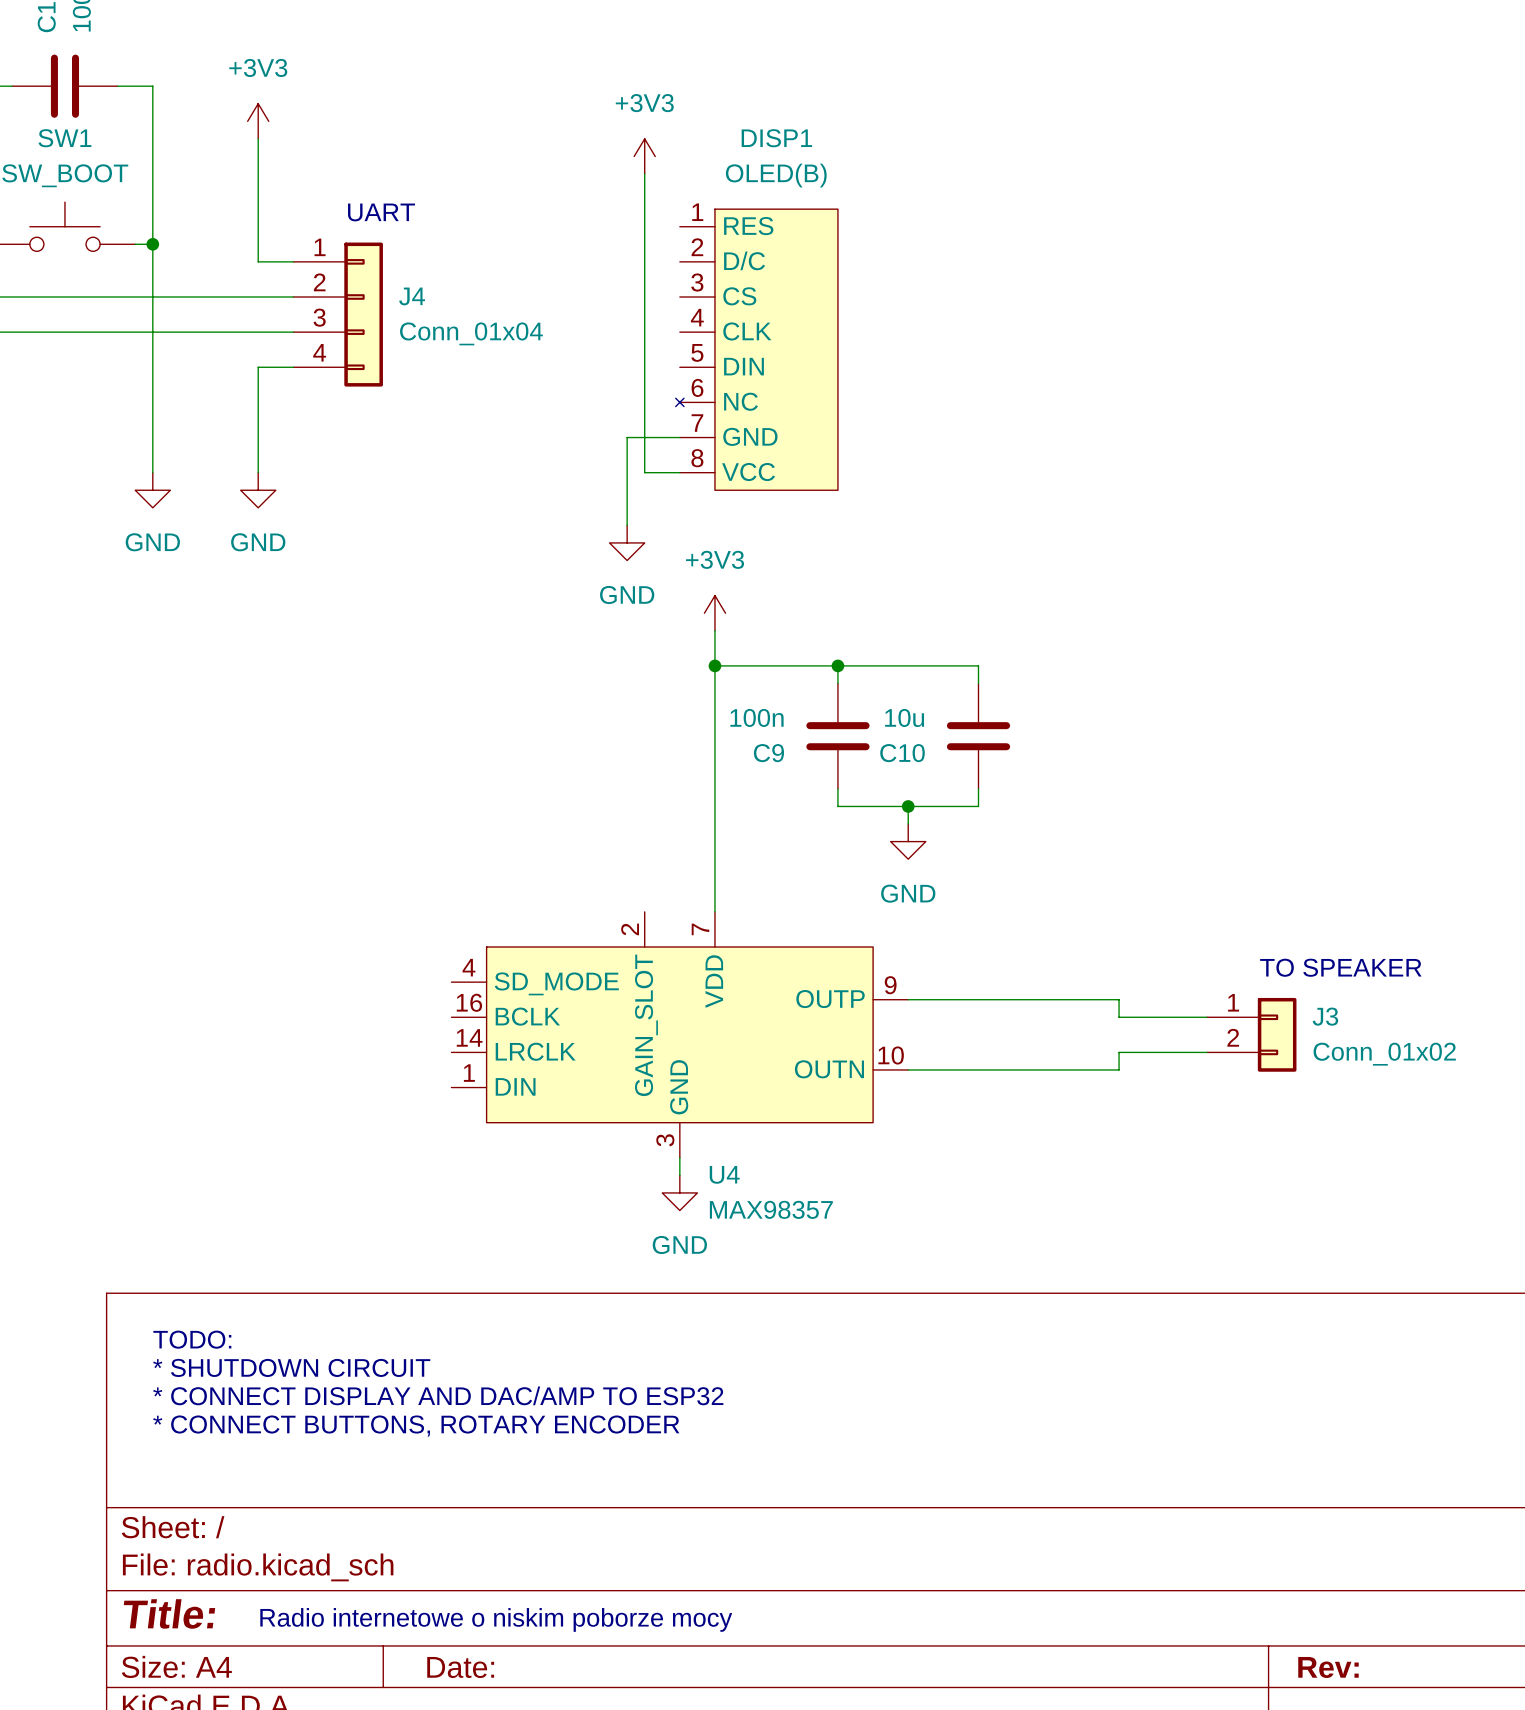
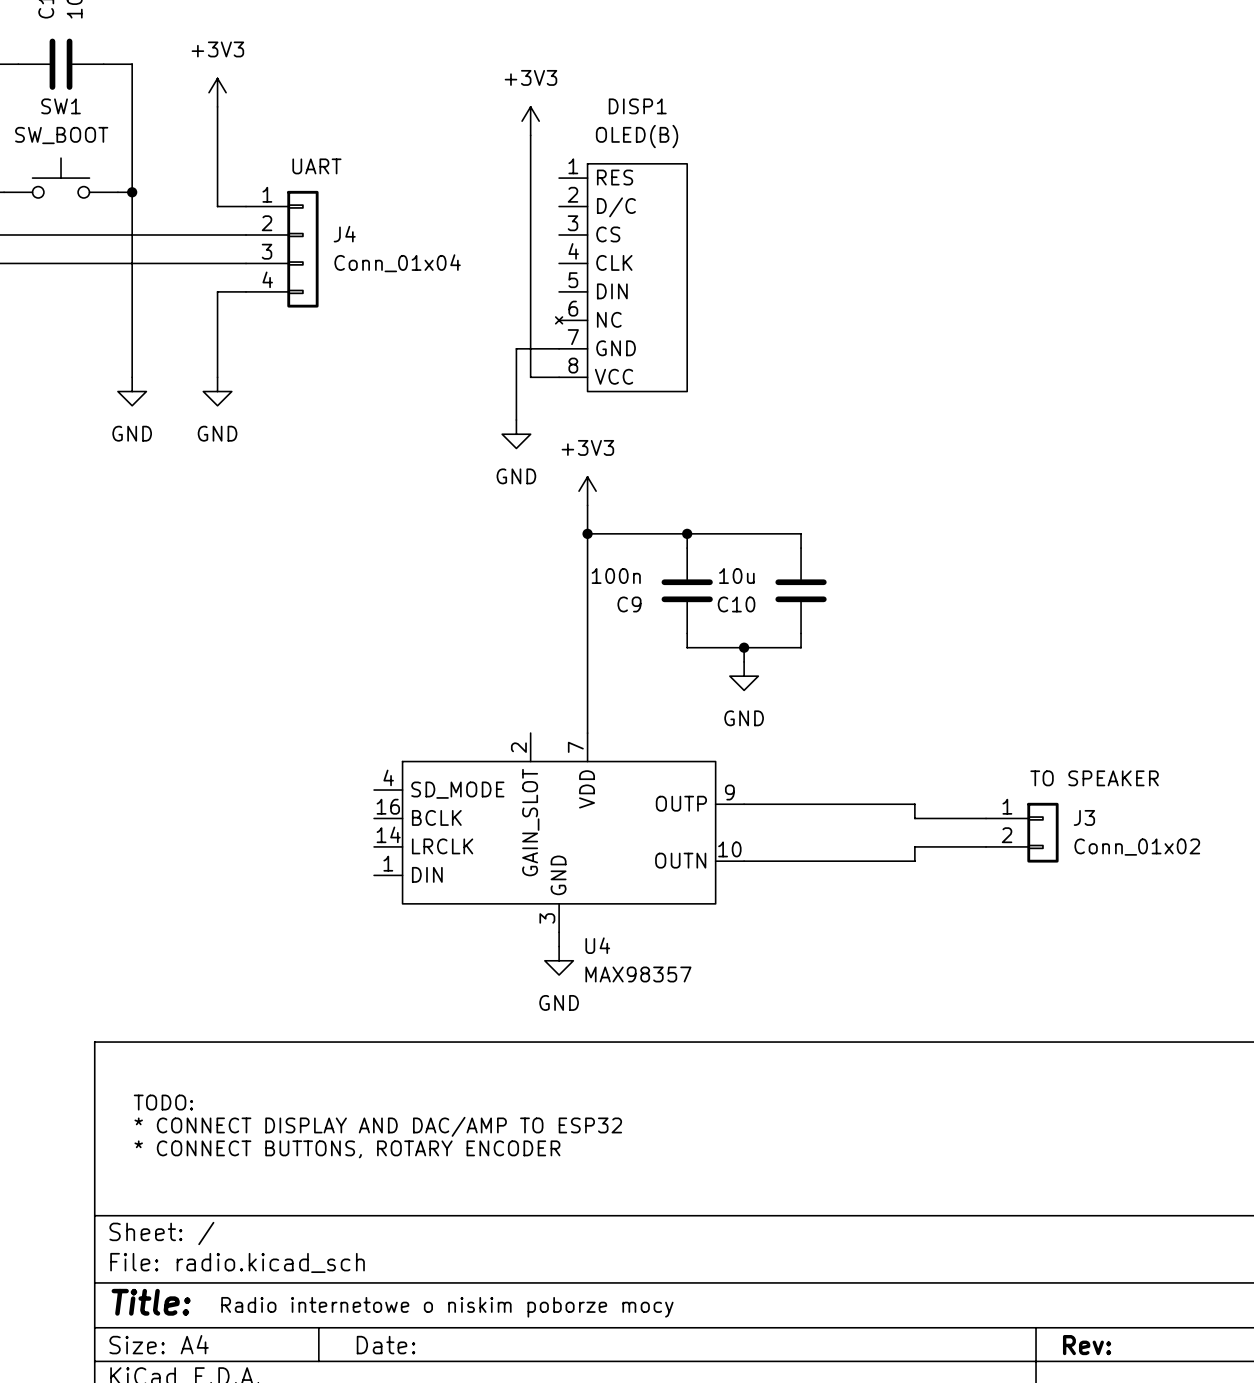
text: TODO: (192, 1339) -> none
text: * SHUTDOWN CIRCUIT (291, 1367) -> TODO: (163, 1102)

